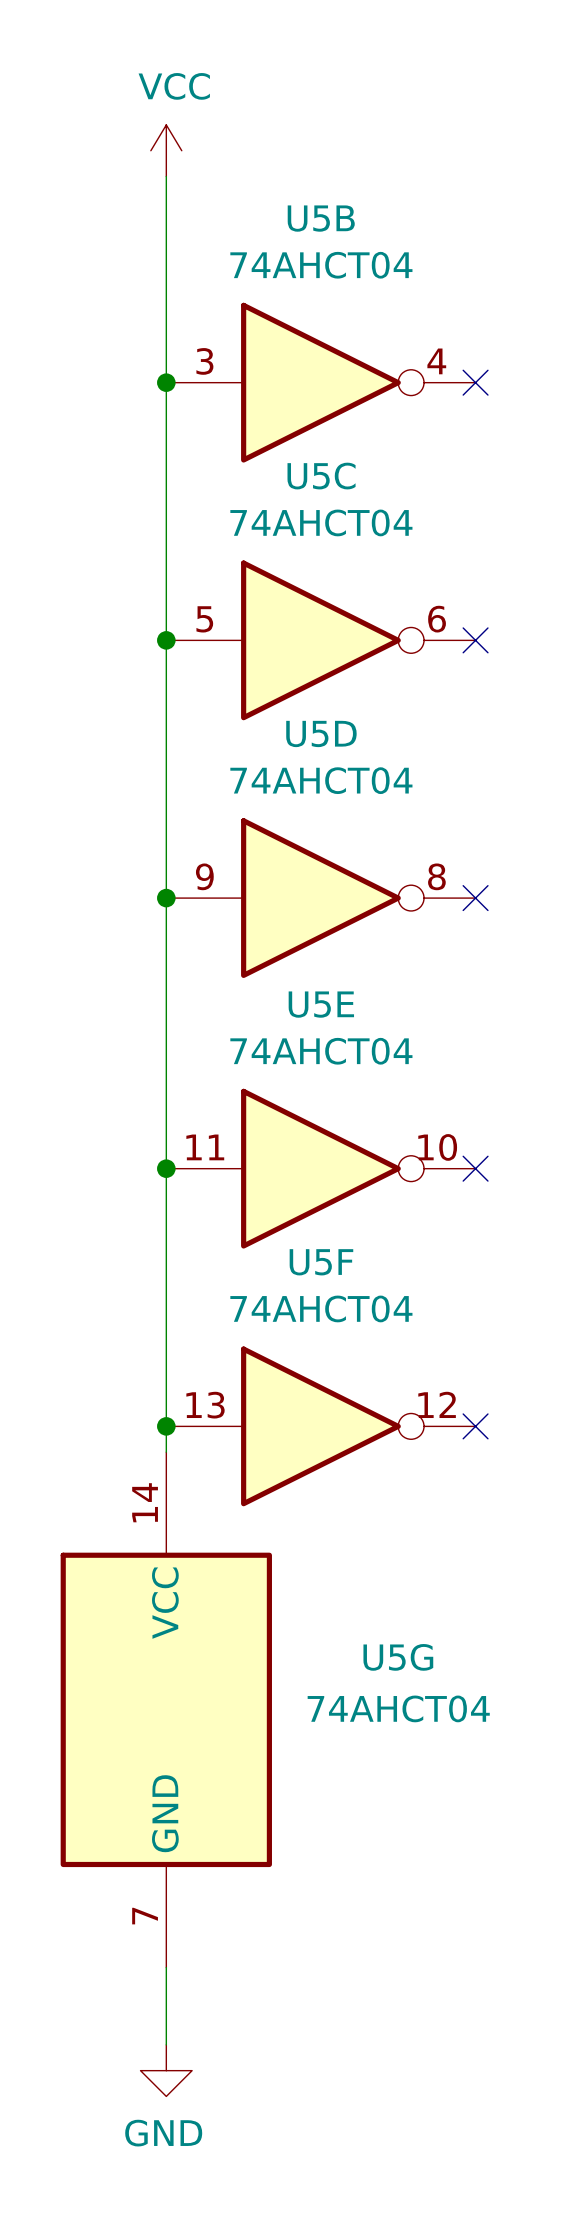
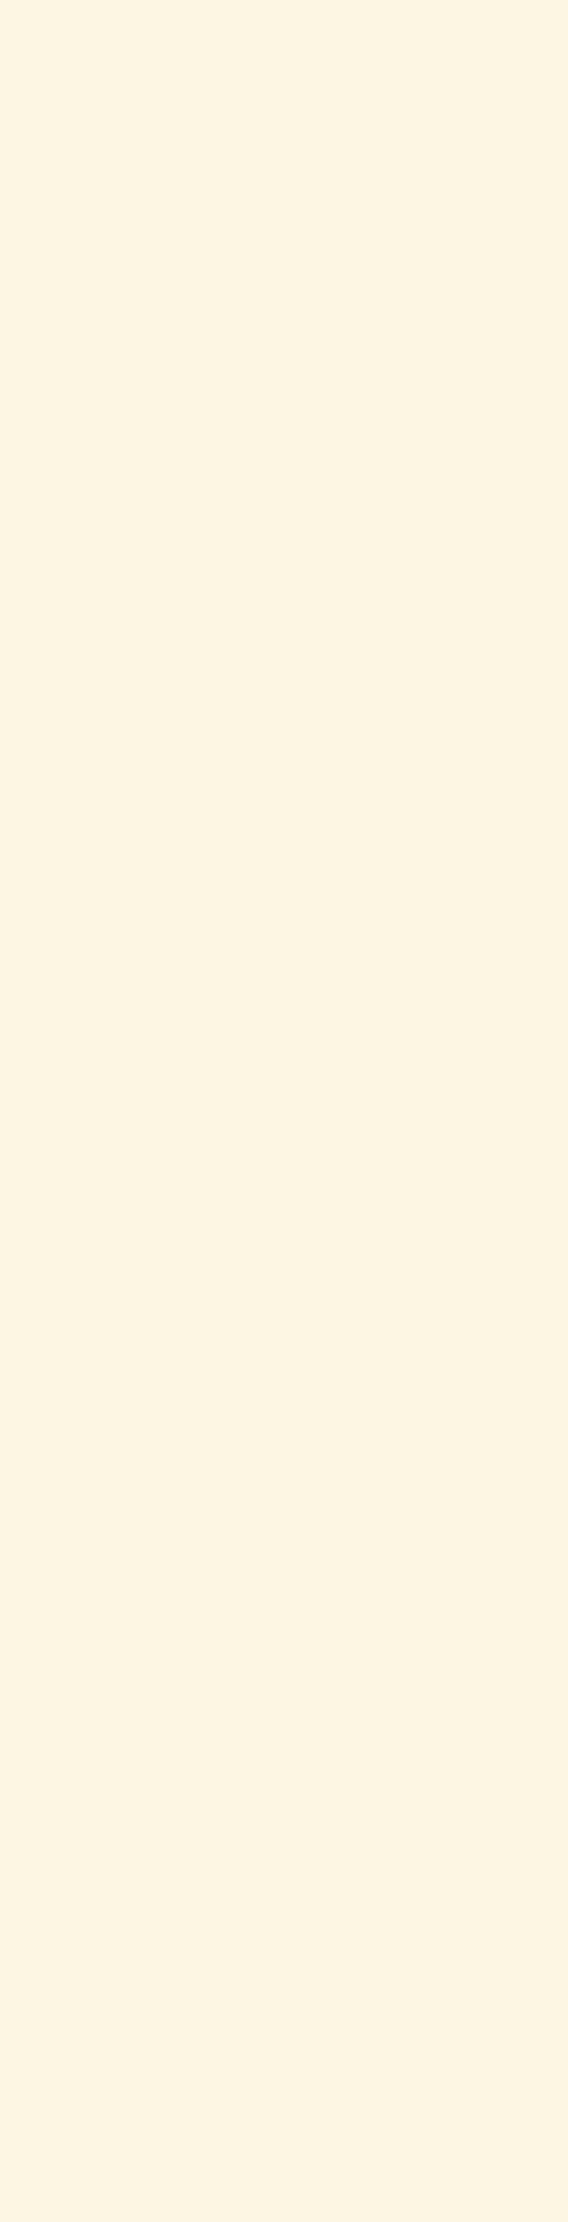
power symbol: VCC (166, 150) -> none
wire: (166, 176) (166, 1452) -> none
junction: (166, 382) -> none
U5B: 74AHCT04 (320, 382) -> none
no-connect mark: (475, 382) -> none
junction: (166, 640) -> none
U5C: 74AHCT04 (320, 640) -> none
no-connect mark: (475, 640) -> none
junction: (166, 898) -> none
U5D: 74AHCT04 (320, 898) -> none
no-connect mark: (475, 898) -> none
junction: (166, 1168) -> none
U5E: 74AHCT04 (320, 1168) -> none
no-connect mark: (475, 1168) -> none
junction: (166, 1426) -> none
U5F: 74AHCT04 (320, 1426) -> none
no-connect mark: (475, 1426) -> none
U5G: 74AHCT04 (166, 1709) -> none
wire: (166, 1967) (166, 2044) -> none
power symbol: GND (166, 2070) -> none

